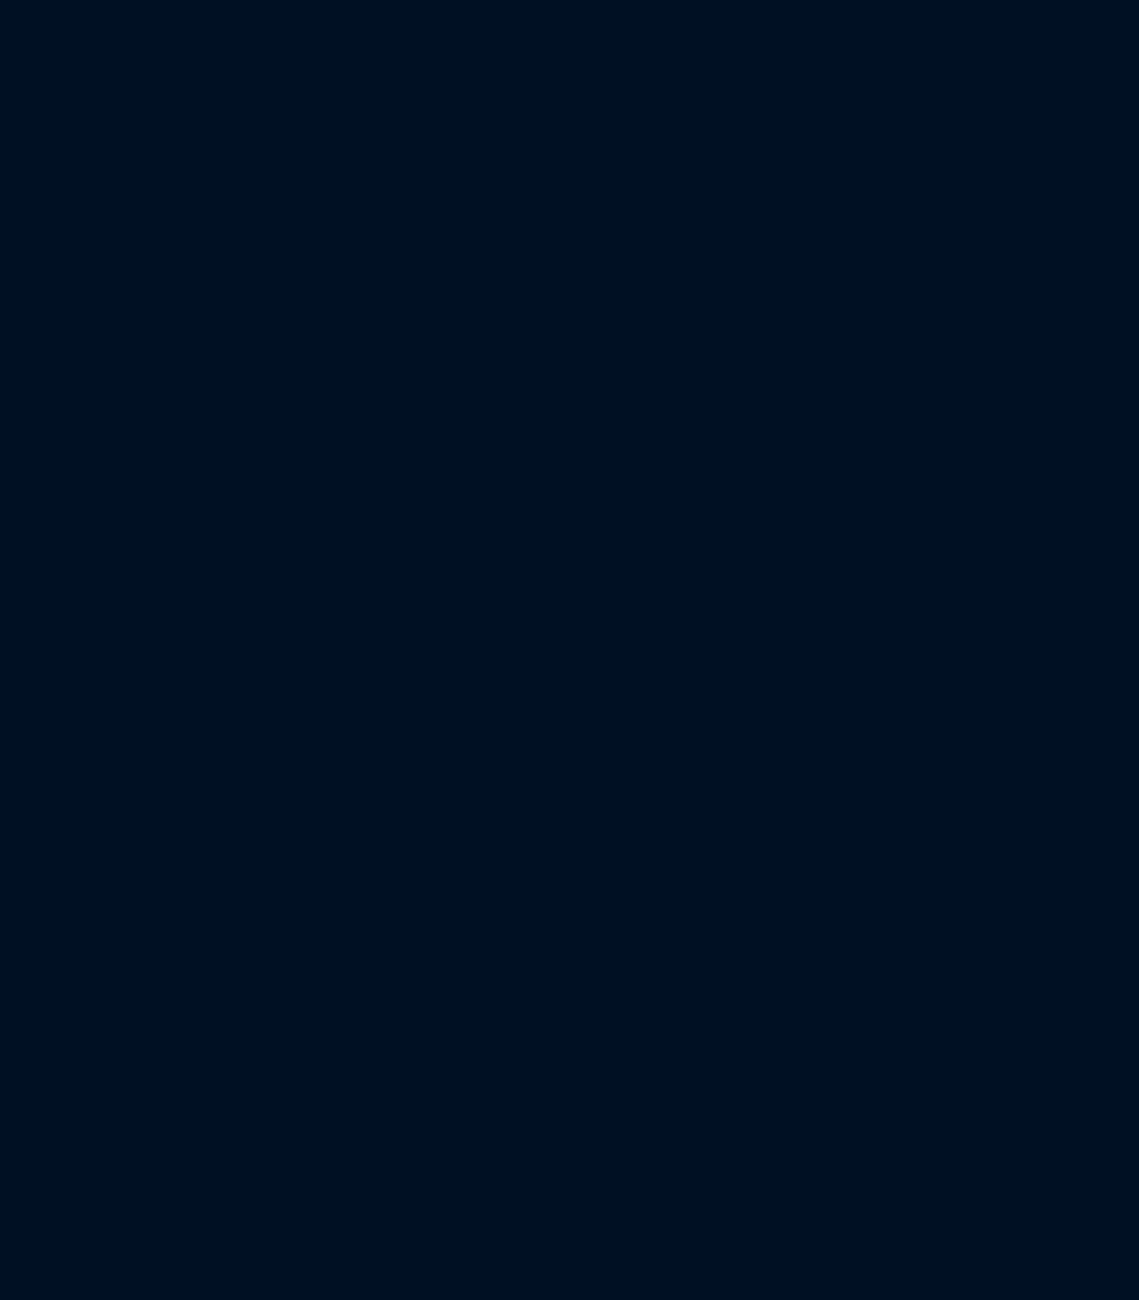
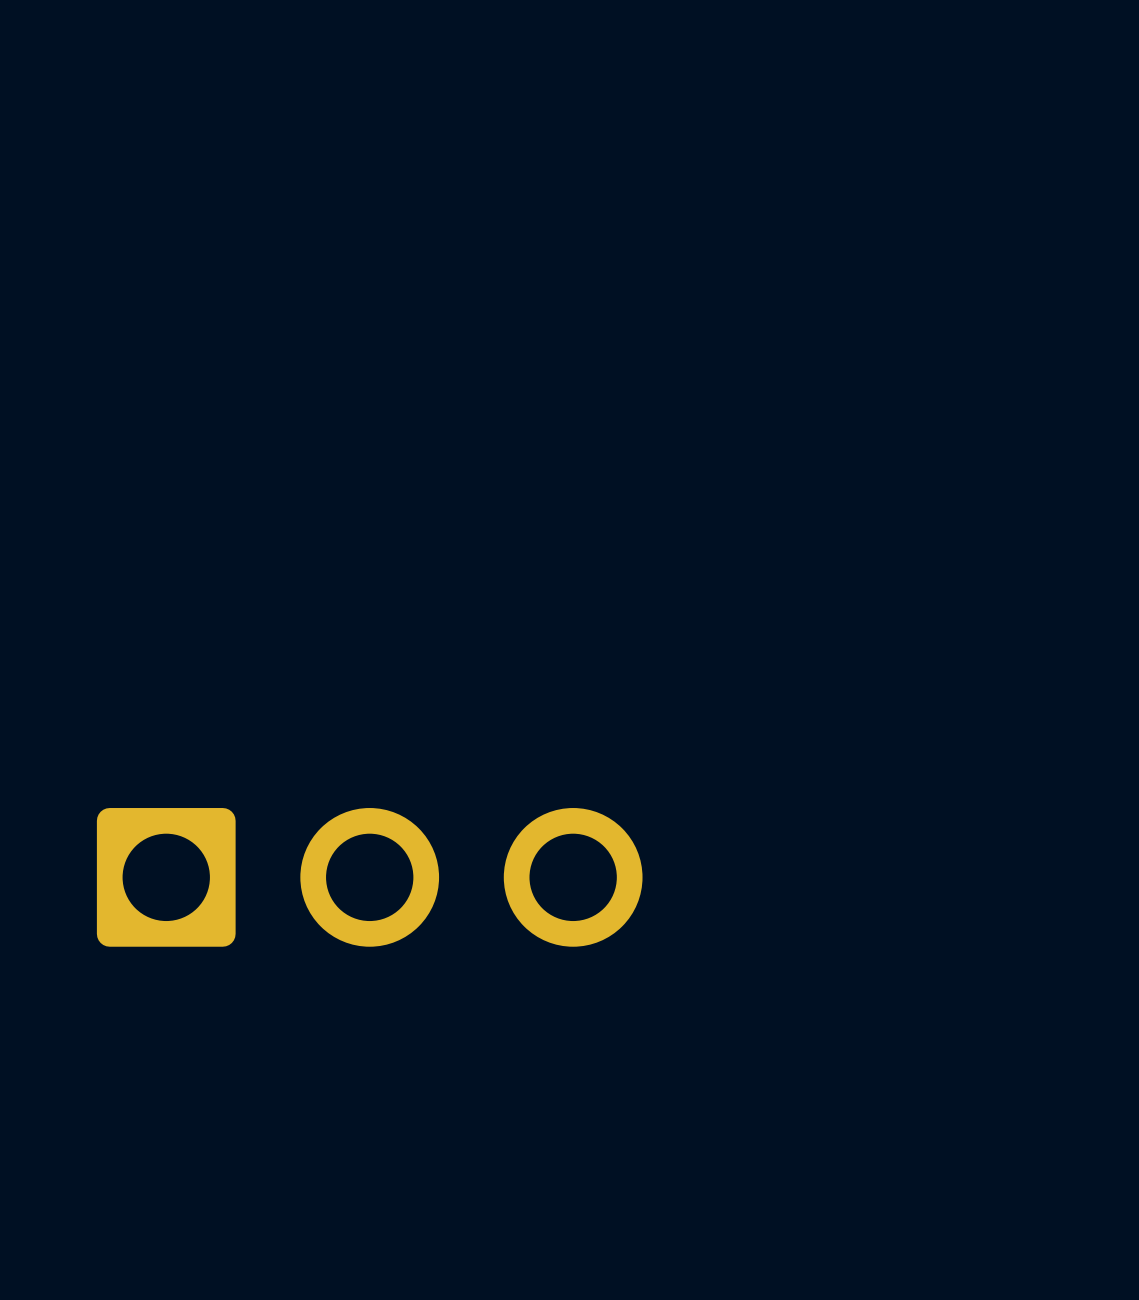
part: none -> (369, 877)

